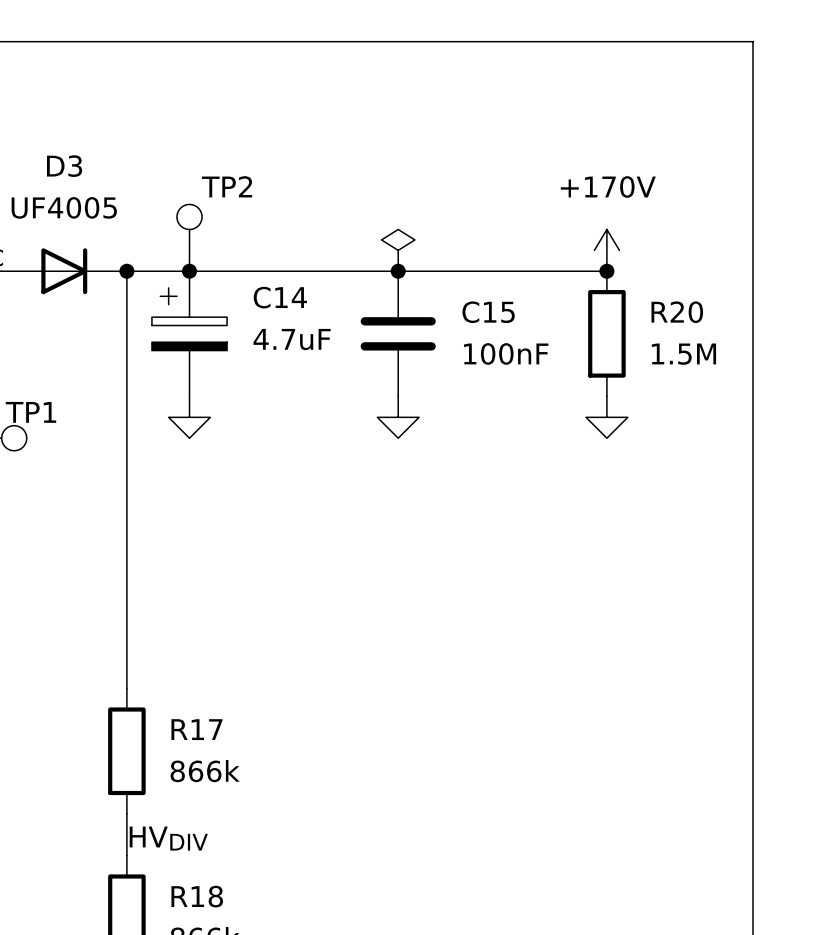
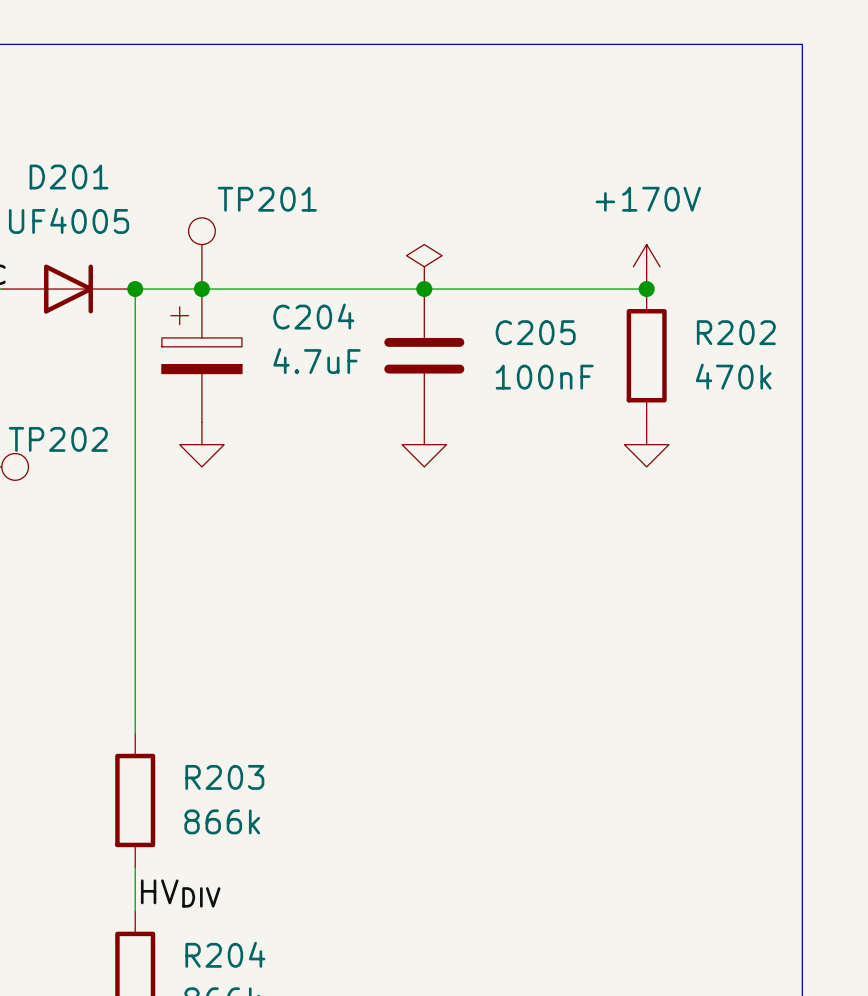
D3 name: D3 (64, 166) -> D201 (69, 177)
TP2 name: TP2 (227, 186) -> TP201 (267, 199)
C14 name: C14 (280, 297) -> C204 (313, 316)
C15 name: C15 (488, 312) -> C205 (535, 332)
R20 name: R20 (677, 312) -> R202 (736, 332)
R20 value: 1.5M (683, 354) -> 470k (733, 376)
TP1 name: TP1 (30, 412) -> TP202 (58, 439)
R17 name: R17 (196, 729) -> R203 (224, 777)
R18 name: R18 (197, 896) -> R204 (225, 954)

